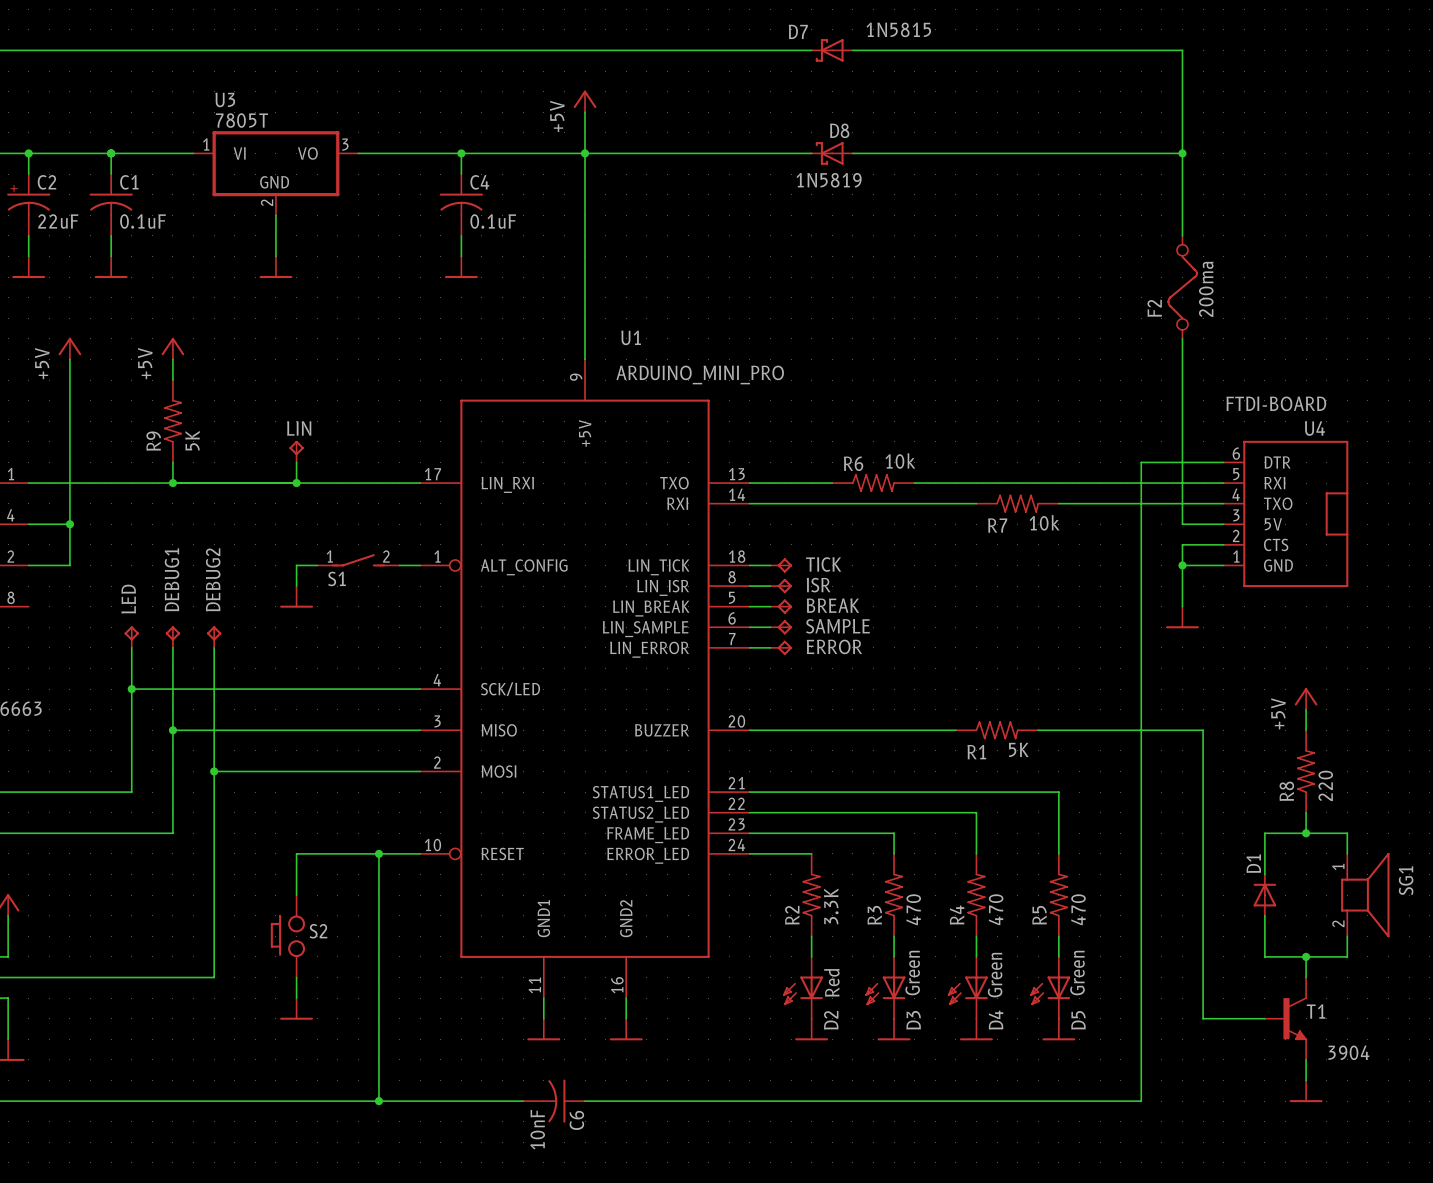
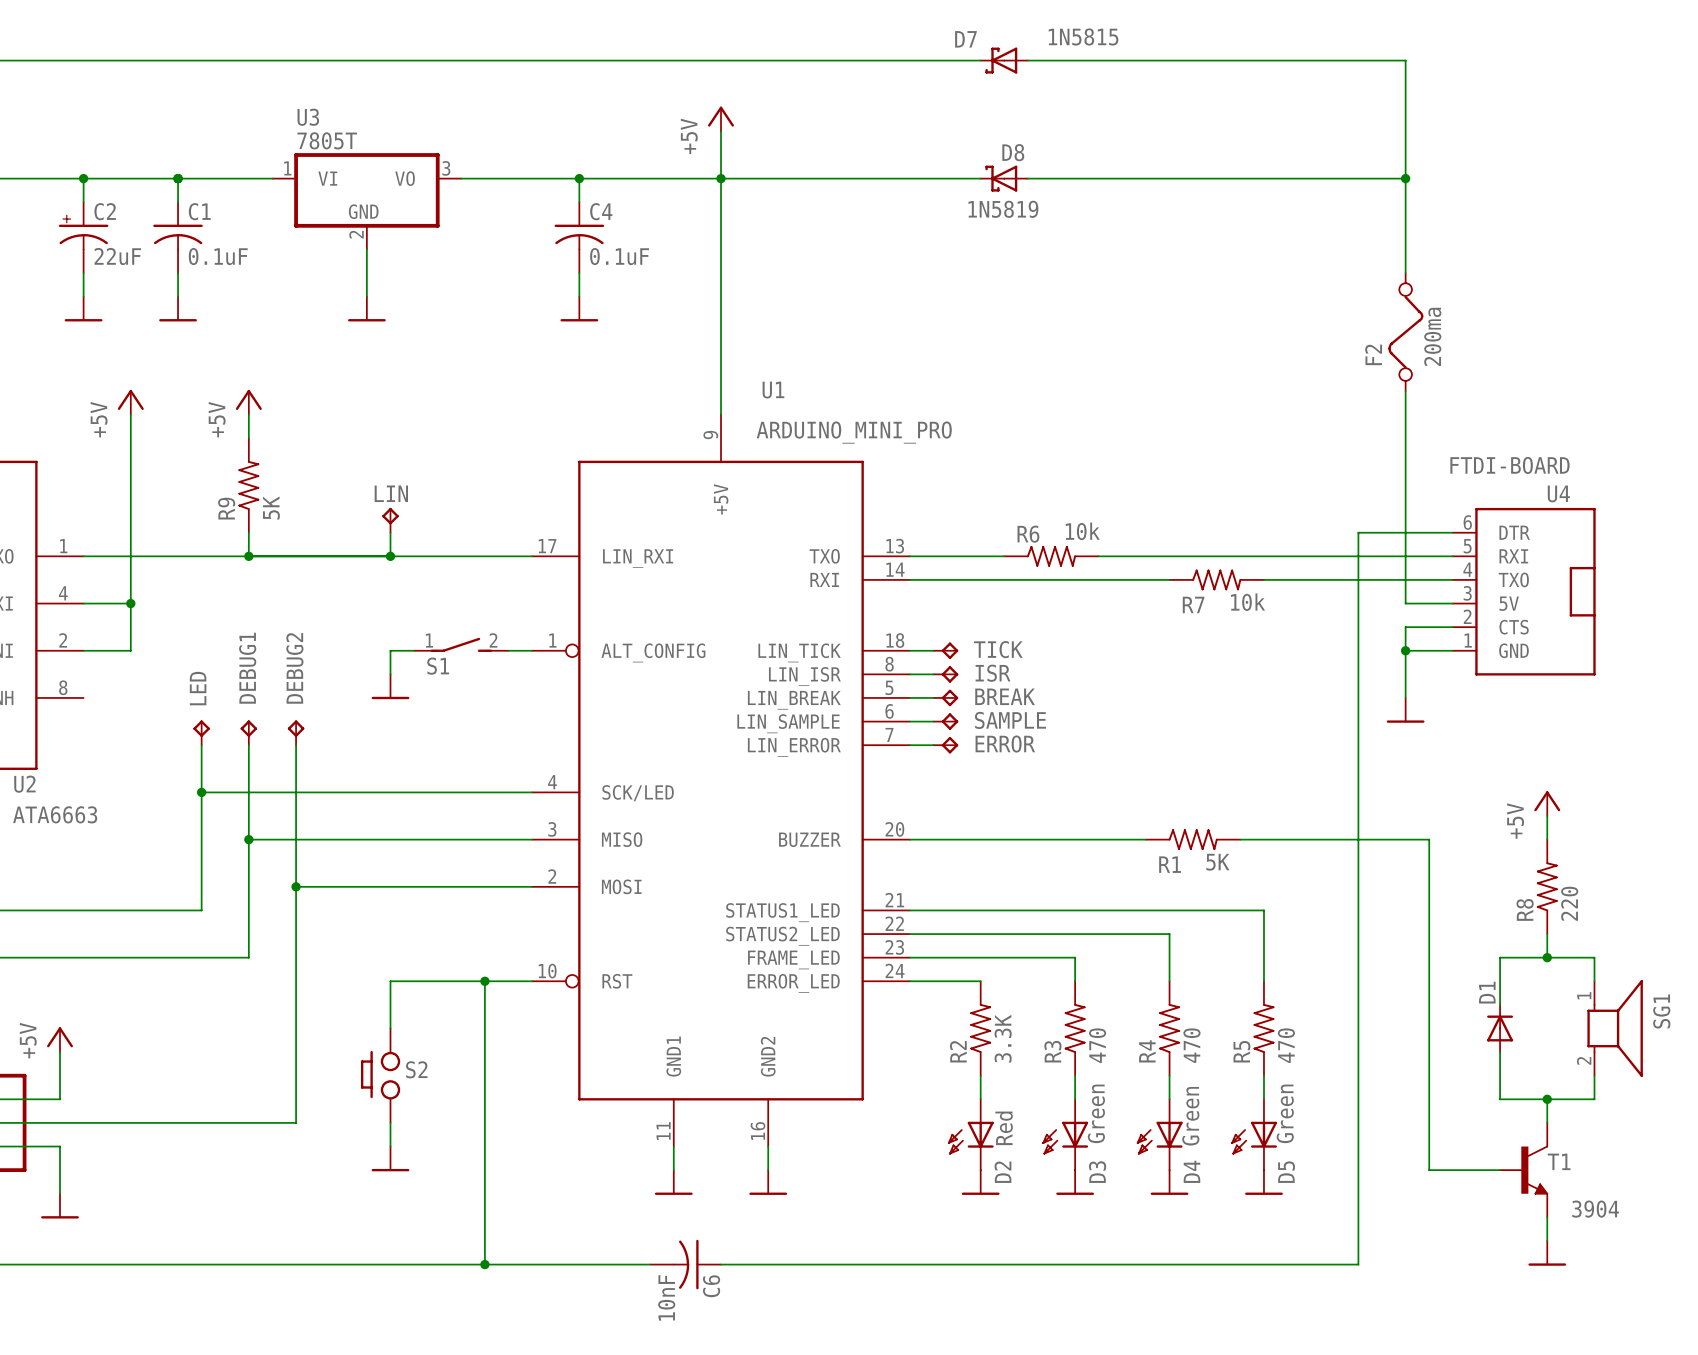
U1 pin name: RESET (502, 853) -> RST (617, 981)

